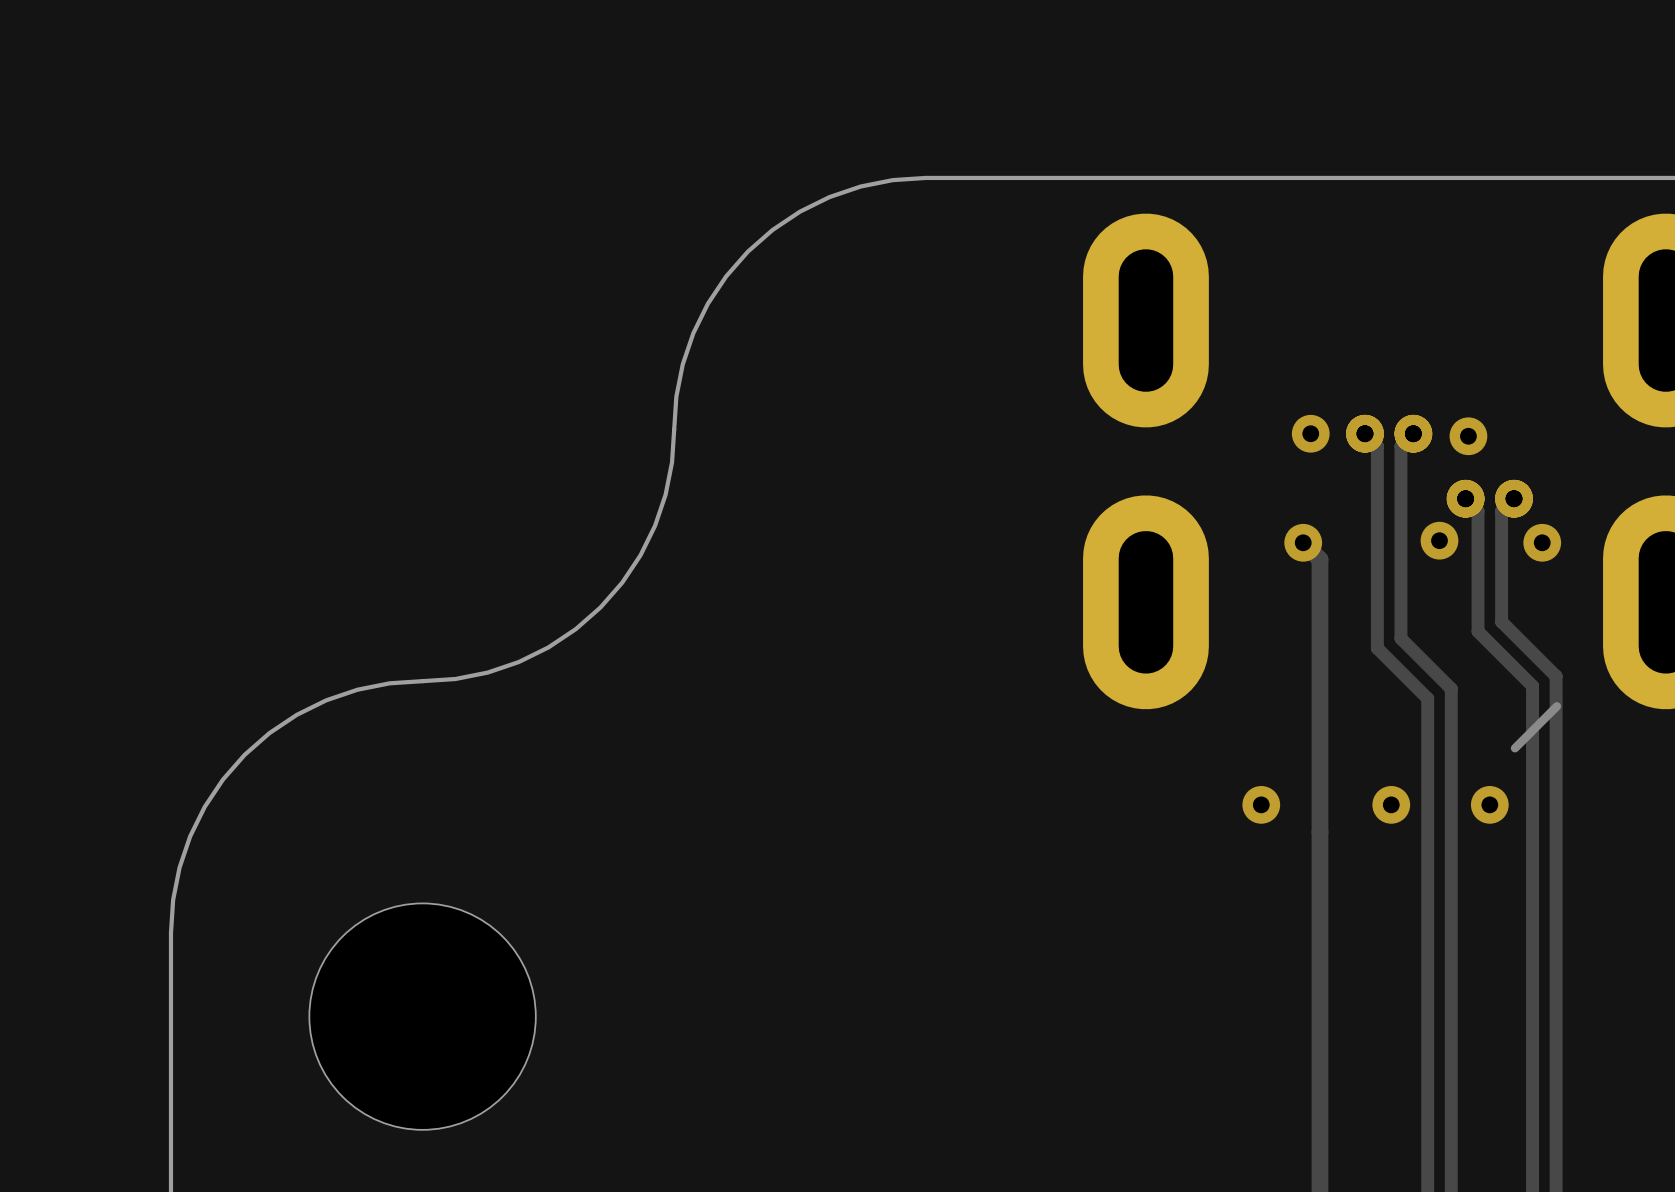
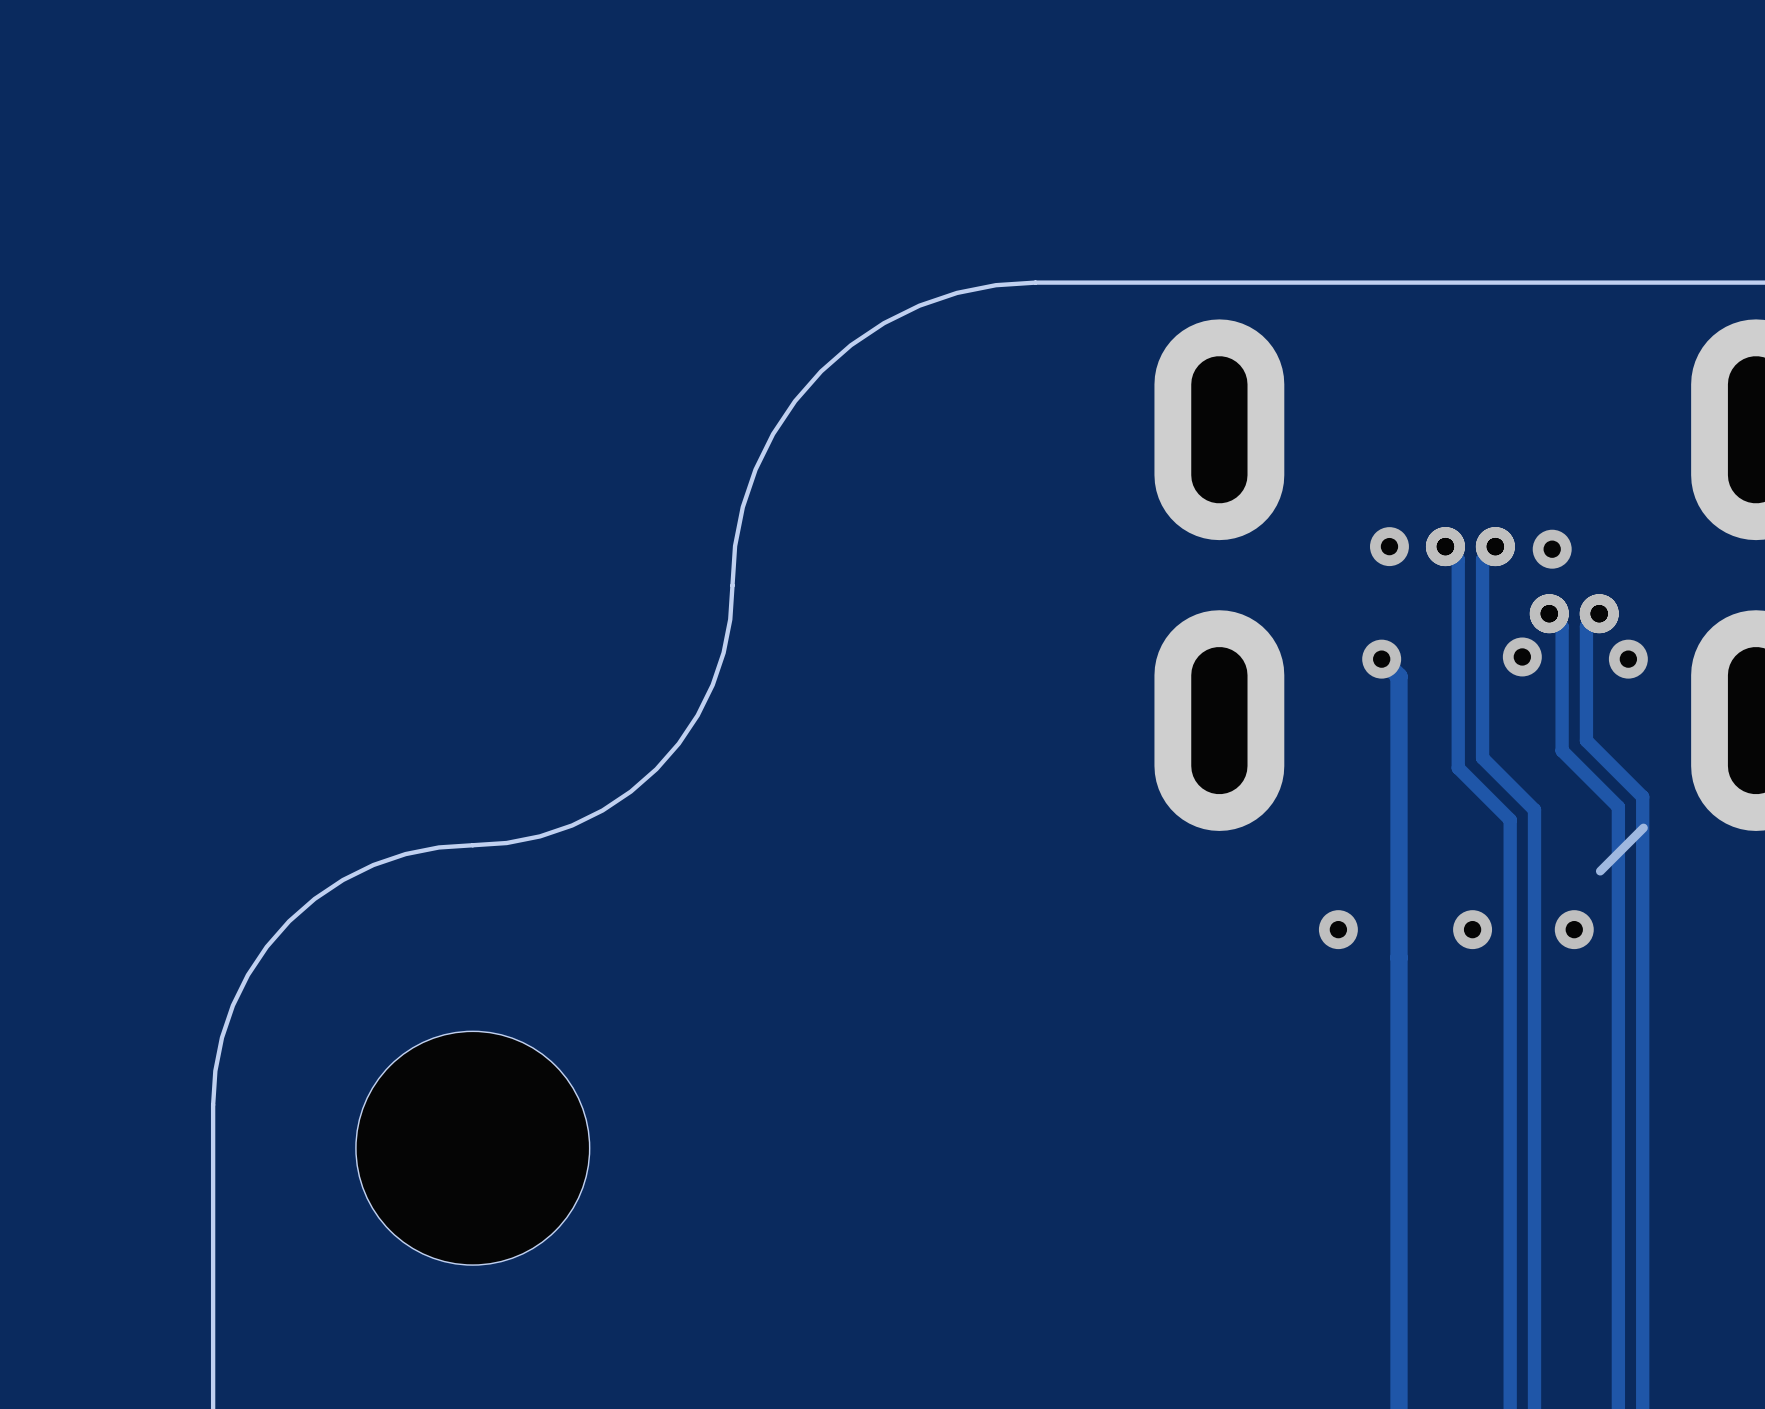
board edge: (967, 177) (892, 180) (860, 186) (829, 197) (800, 211) (772, 229) (747, 251) (726, 276) (707, 303) (693, 333) (682, 364) (676, 396) (672, 462) (665, 494) (655, 525) (640, 555) (622, 582) (600, 607) (575, 629) (548, 647) (518, 662) (487, 672) (455, 679) (389, 683) (357, 689) (326, 700) (296, 714) (269, 733) (244, 754) (222, 779) (204, 806) (190, 836) (179, 867) (173, 899) (170, 974) -> (1035, 282) (995, 285) (957, 292) (919, 305) (883, 323) (851, 345) (821, 371) (795, 401) (773, 434) (755, 469) (742, 507) (735, 546) (730, 619) (723, 652) (712, 684) (697, 715) (678, 743) (656, 769) (630, 791) (602, 810) (572, 825) (540, 836) (506, 843) (438, 847) (405, 854) (373, 865) (342, 880) (314, 898) (289, 921) (266, 946) (247, 975) (232, 1005) (221, 1037) (215, 1071) (213, 1104)

